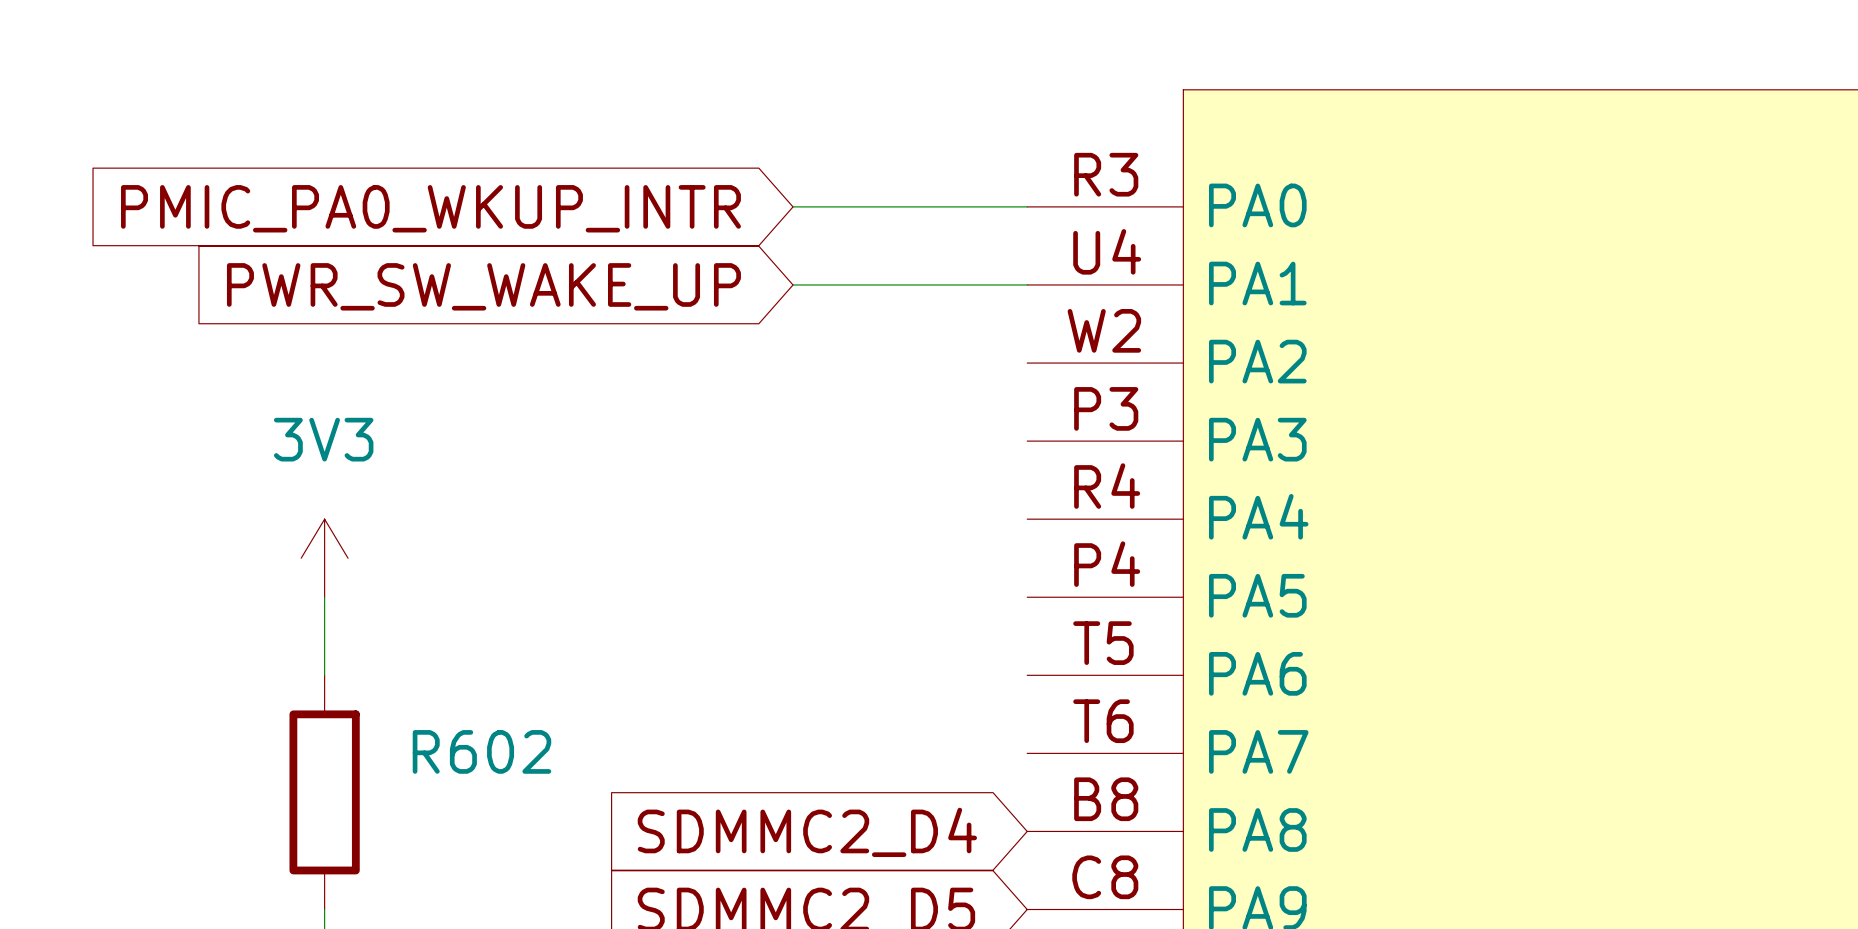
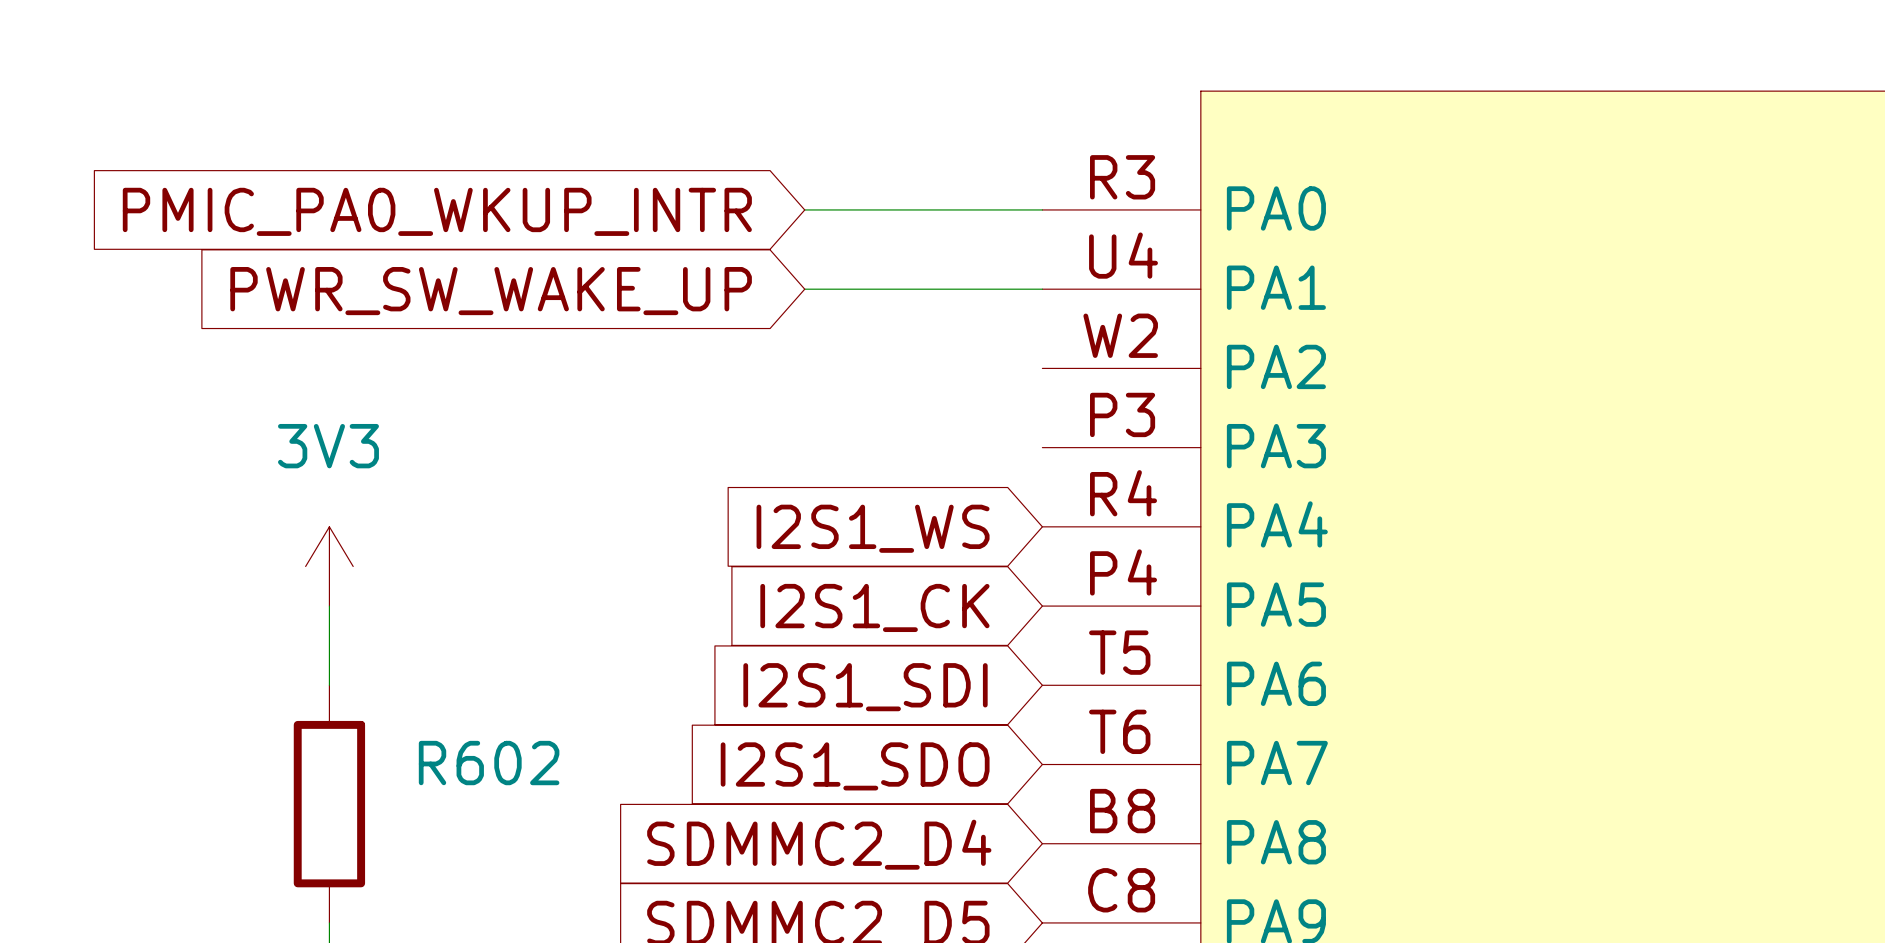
global label: none -> I2S1_WS (873, 528)
global label: none -> I2S1_CK (874, 607)
global label: none -> I2S1_SDI (865, 687)
global label: none -> I2S1_SDO (855, 766)

